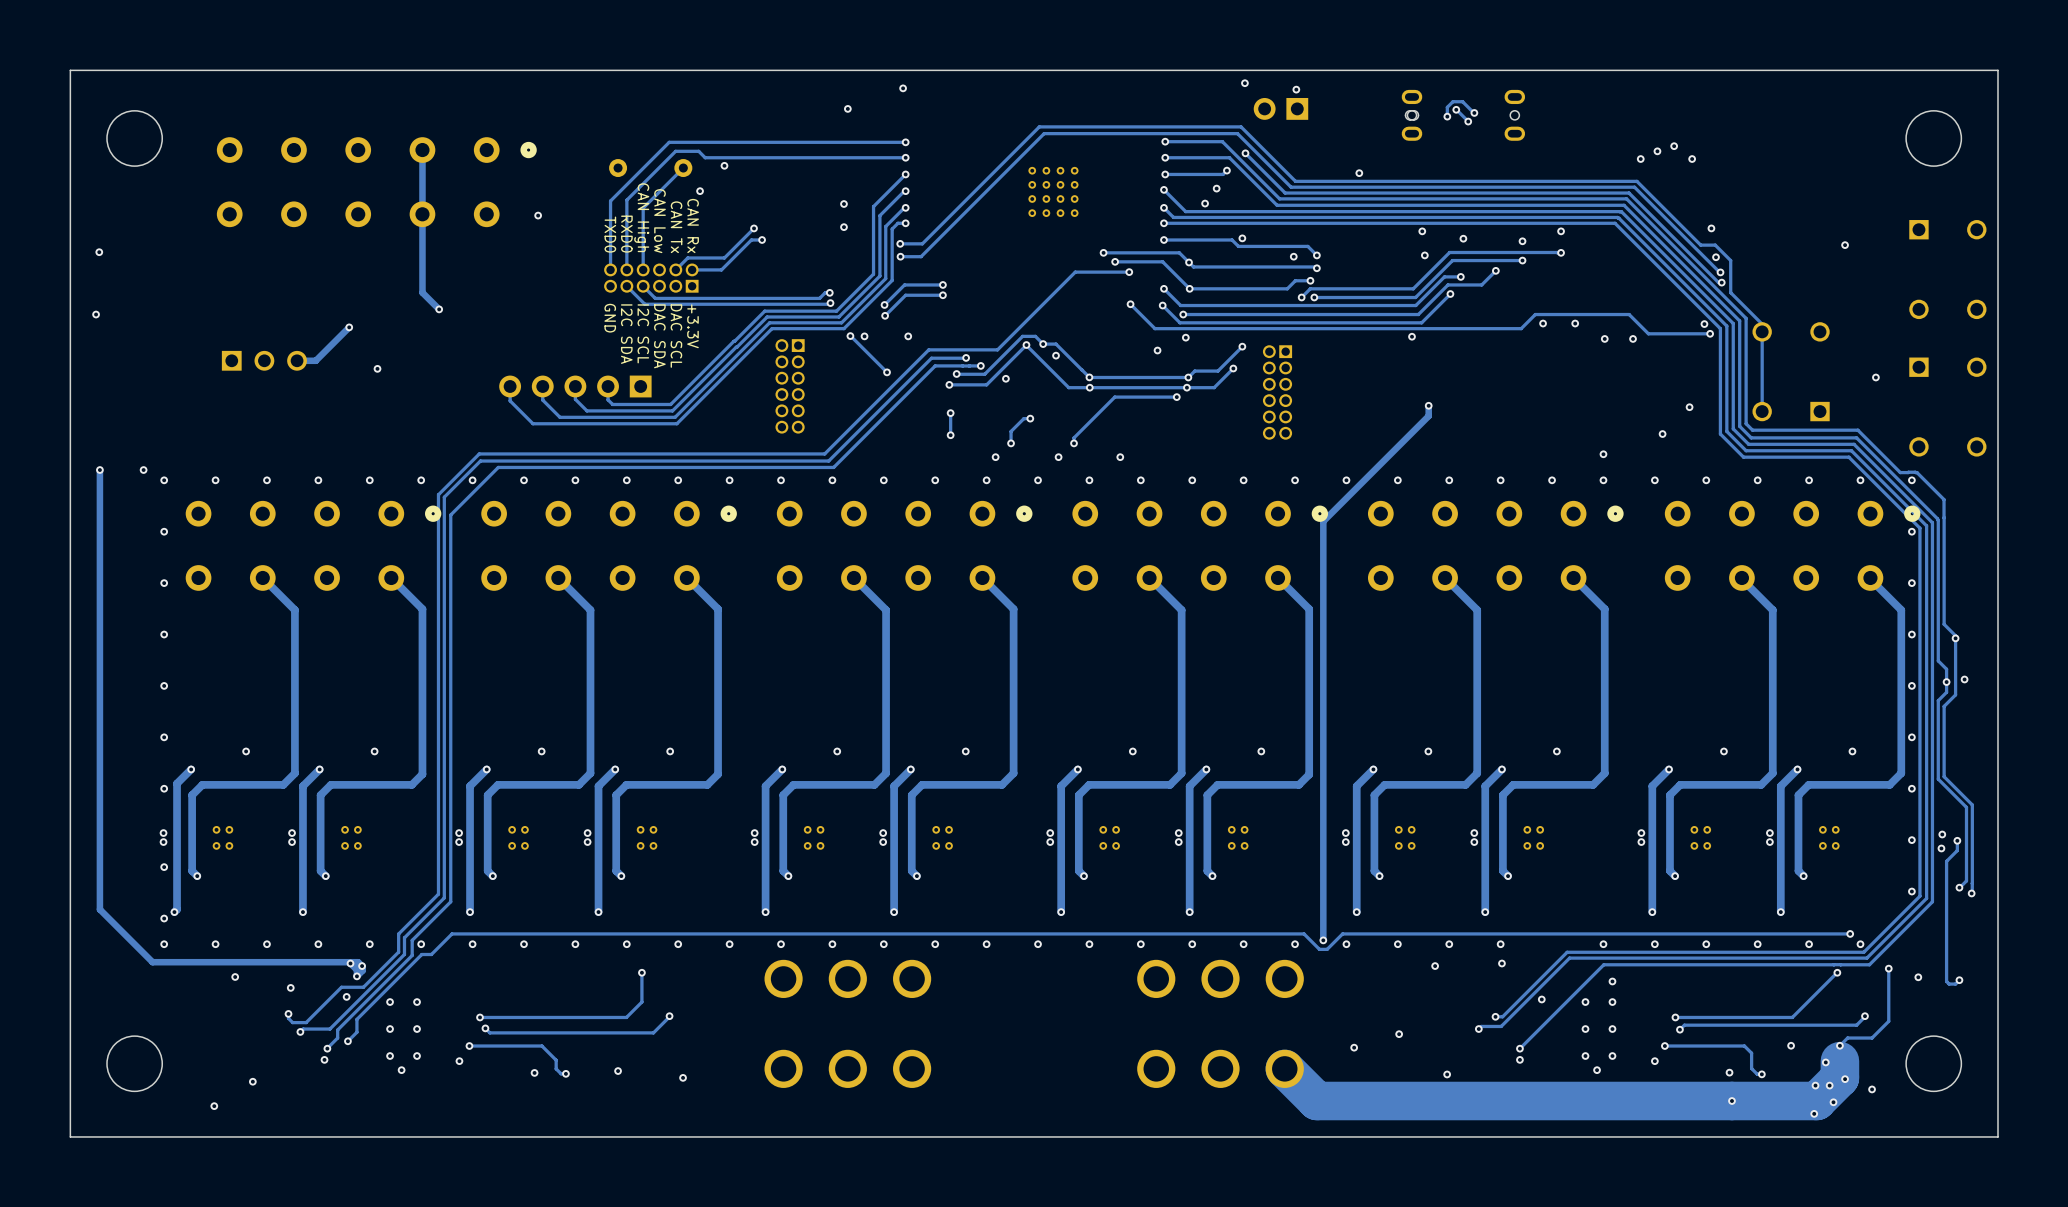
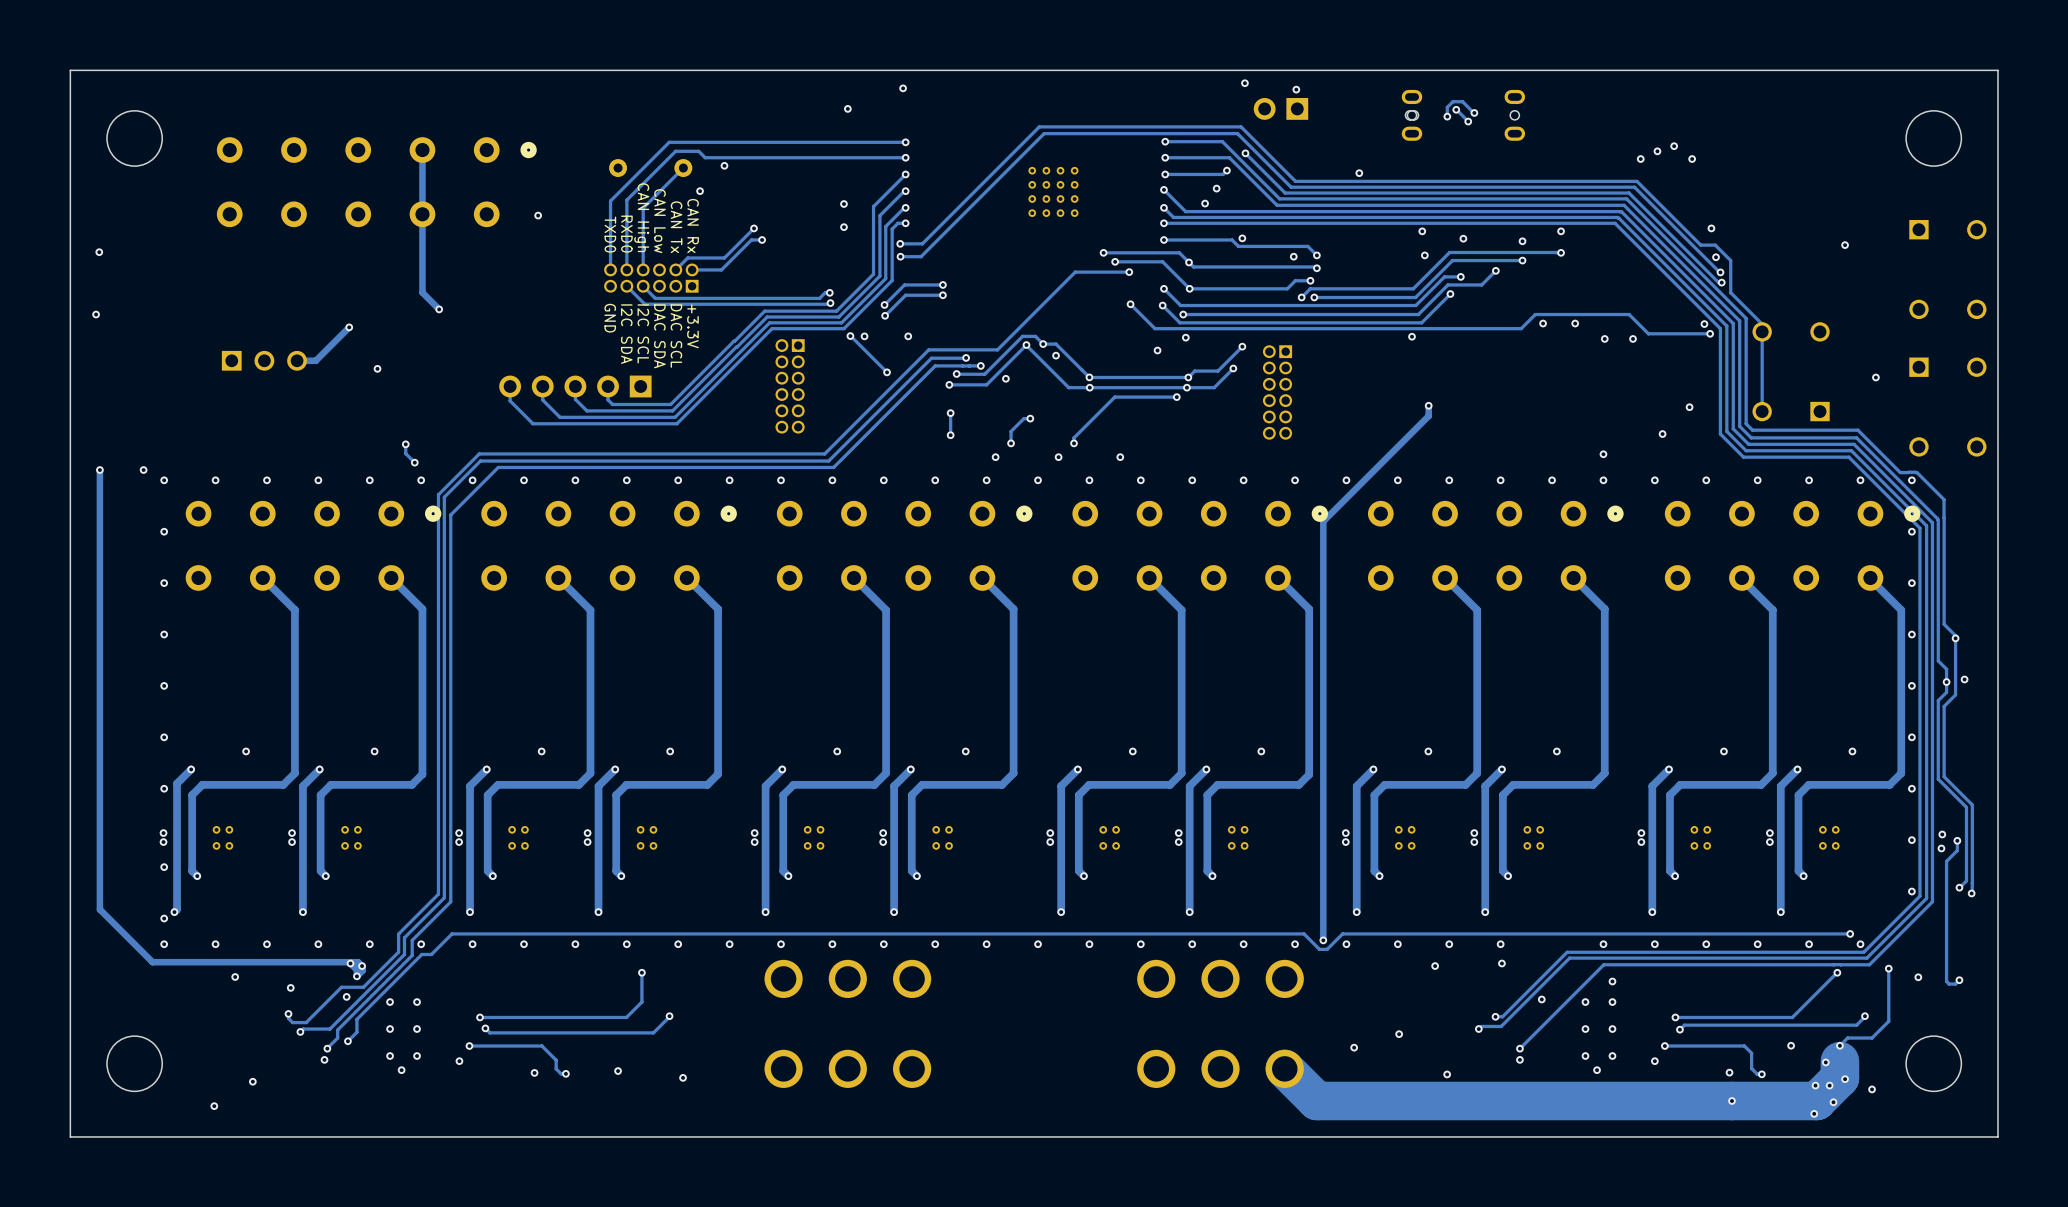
track: none -> (405, 444) (405, 453) (414, 462)
via: none -> (405, 444)
via: none -> (414, 462)

